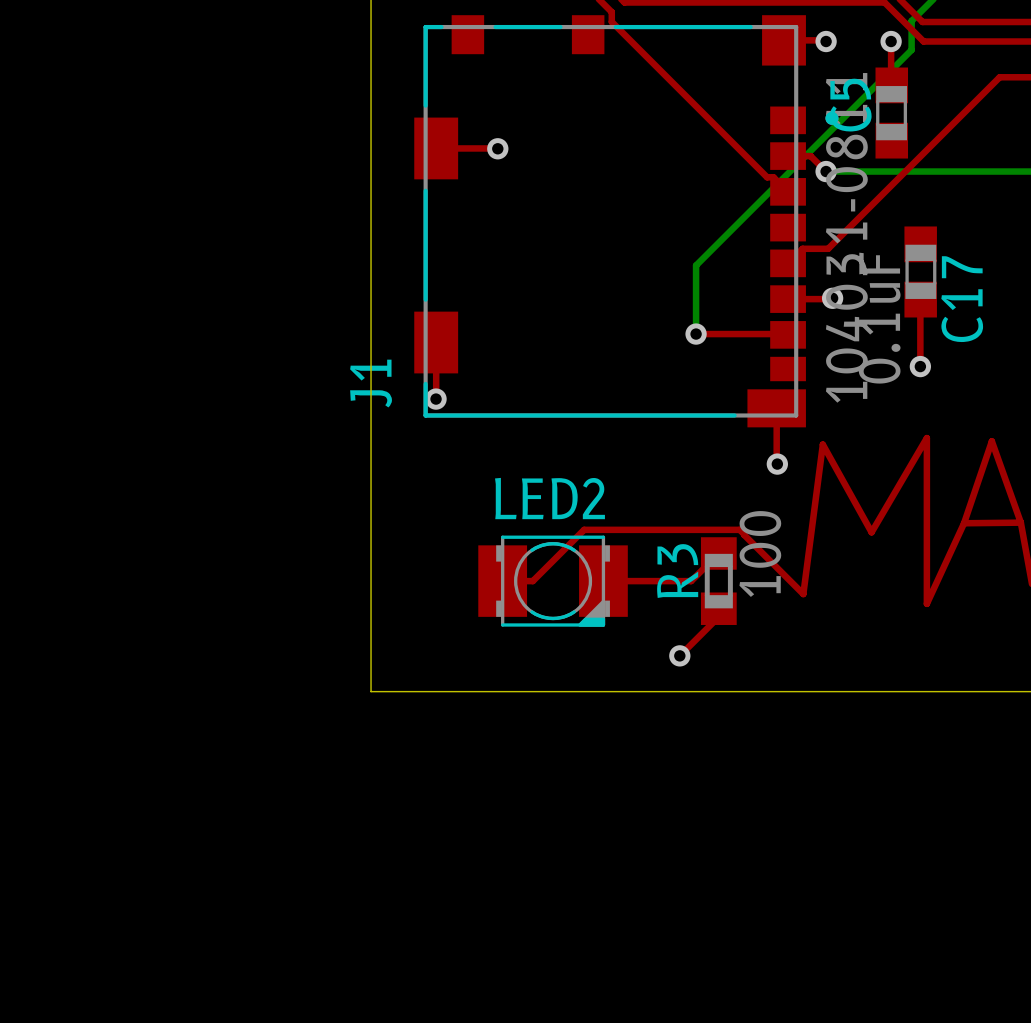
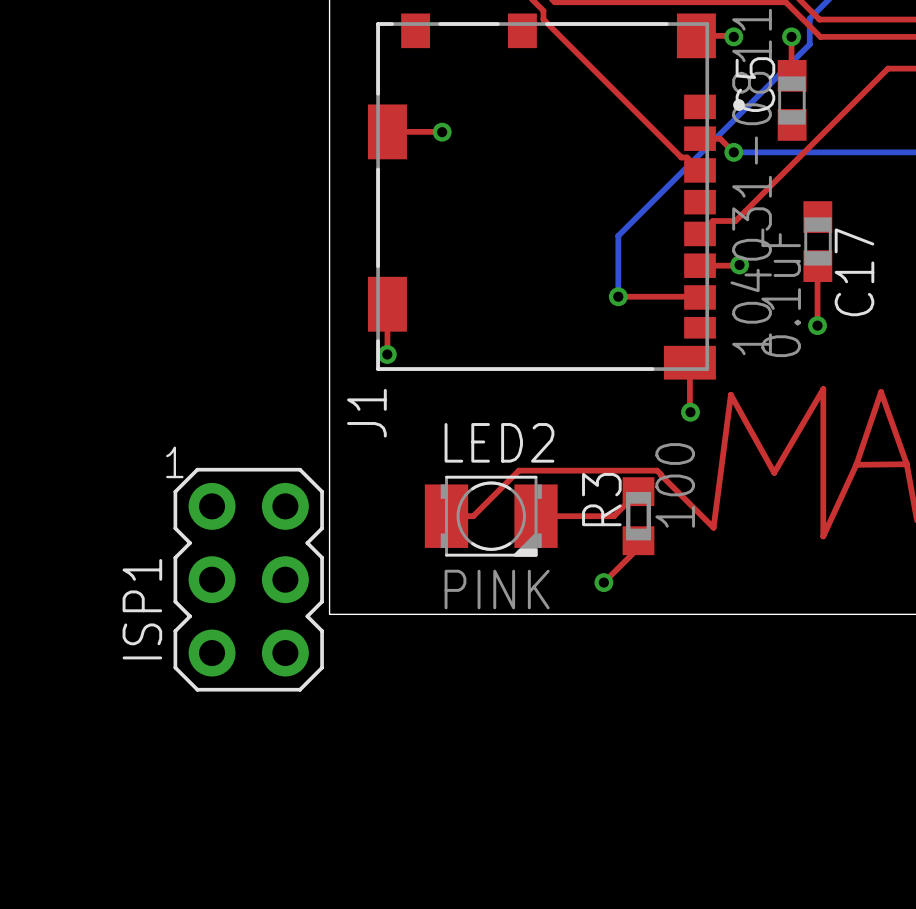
J1 name position: J1 (371, 383) -> J1 (366, 413)
ISP1: none -> (248, 579)
LED2 value: none -> PINK (497, 589)

